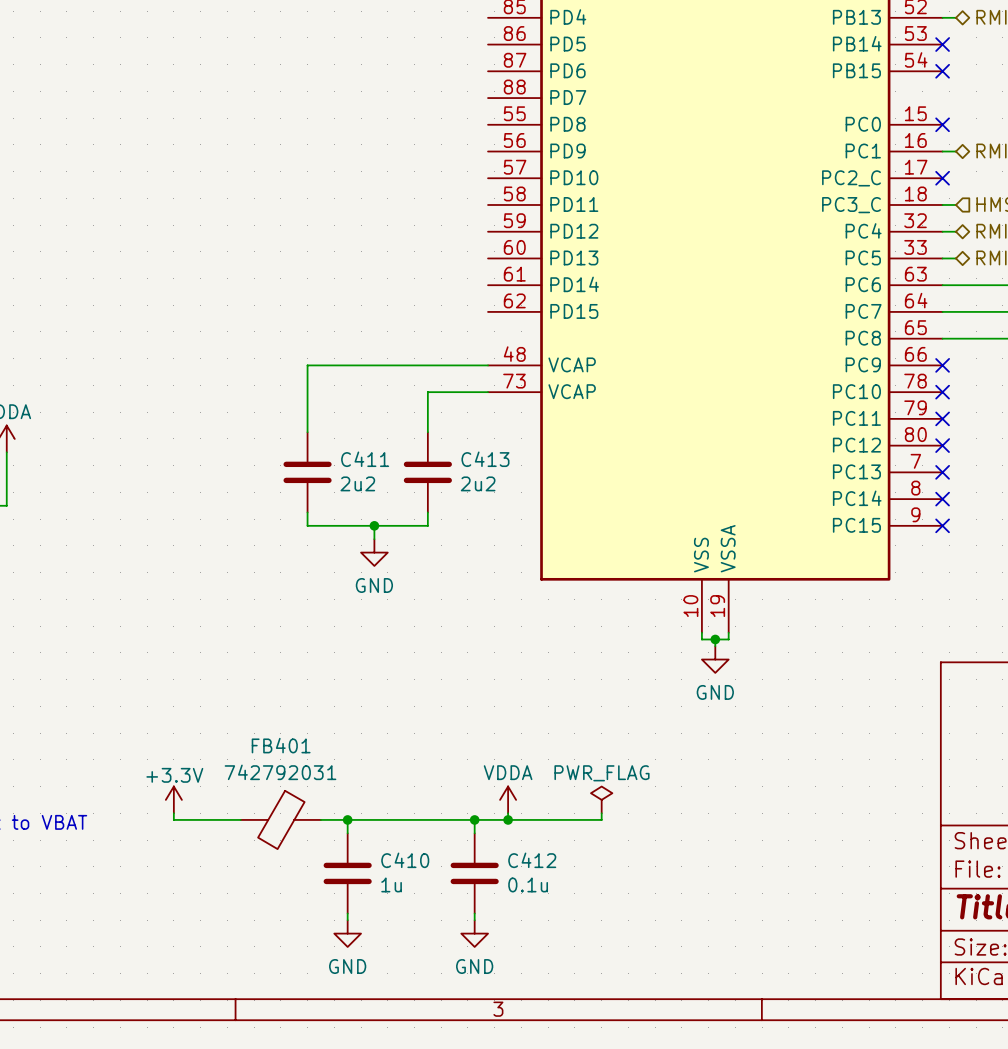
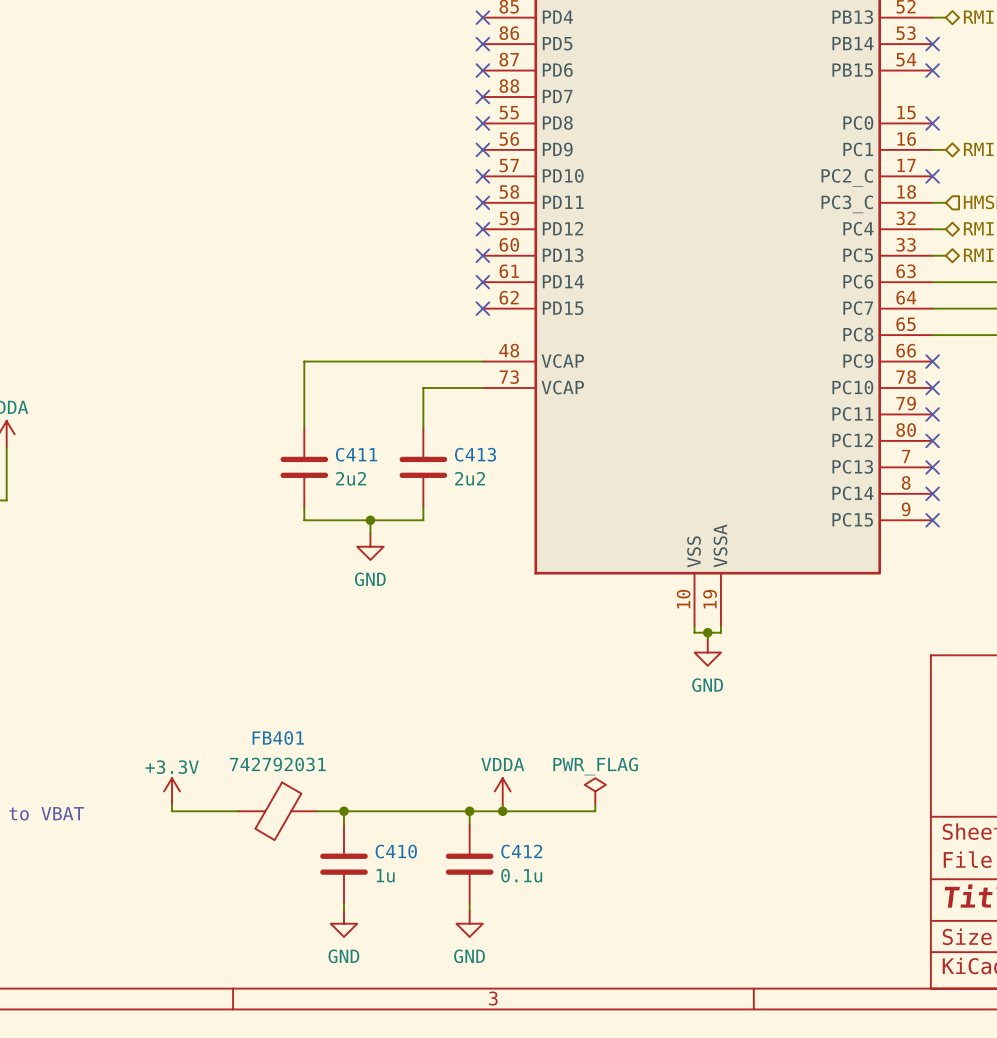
no-connect mark: none -> (482, 17)
no-connect mark: none -> (482, 44)
no-connect mark: none -> (482, 70)
no-connect mark: none -> (482, 97)
no-connect mark: none -> (482, 123)
no-connect mark: none -> (482, 149)
no-connect mark: none -> (482, 176)
no-connect mark: none -> (482, 202)
no-connect mark: none -> (482, 229)
no-connect mark: none -> (482, 255)
no-connect mark: none -> (482, 282)
no-connect mark: none -> (482, 308)

